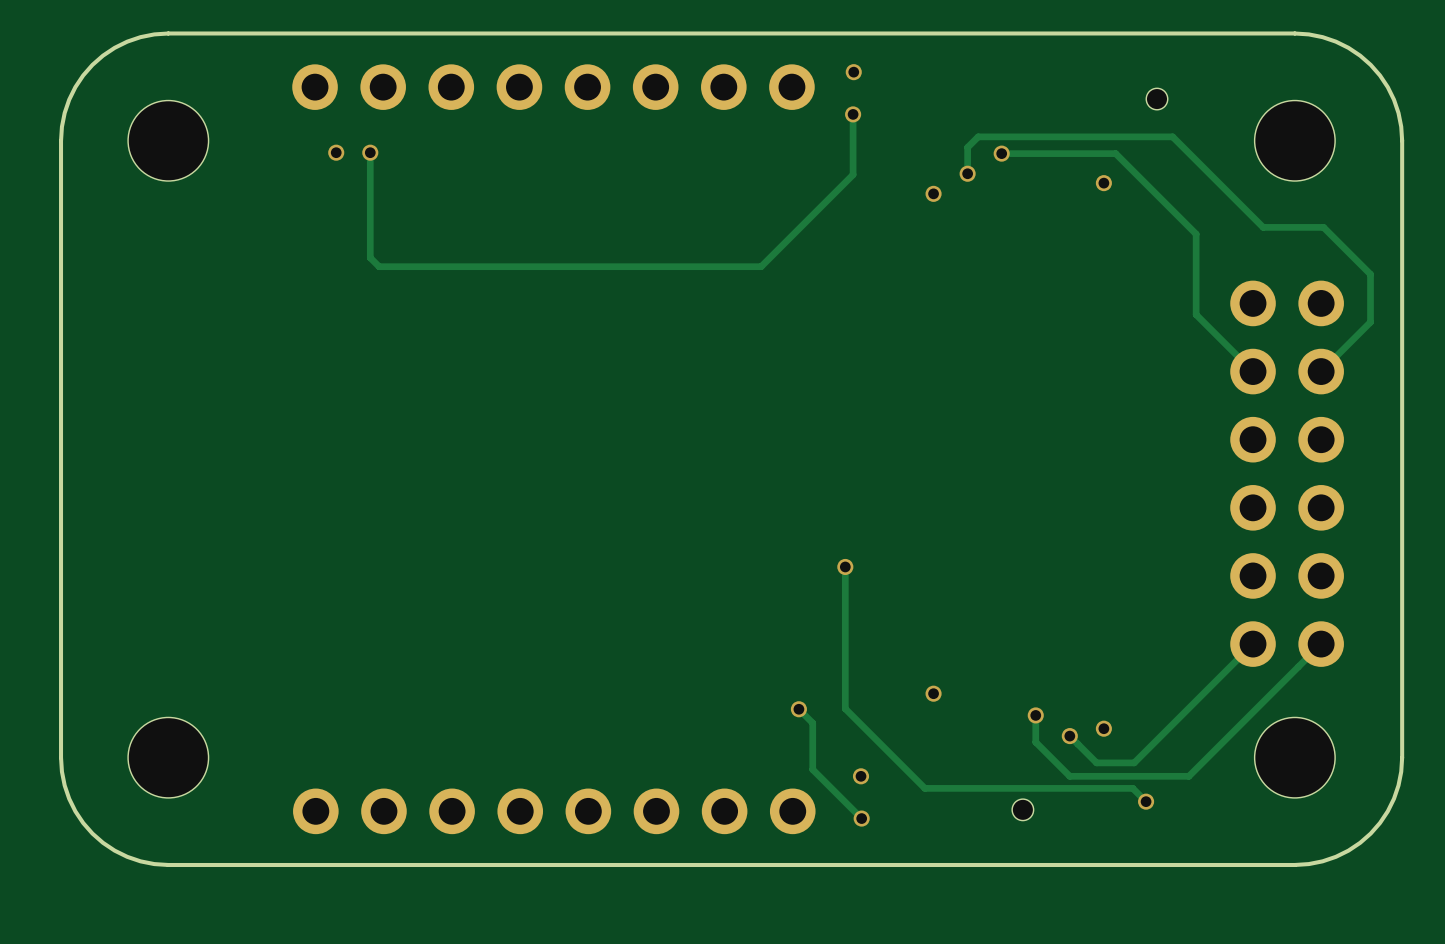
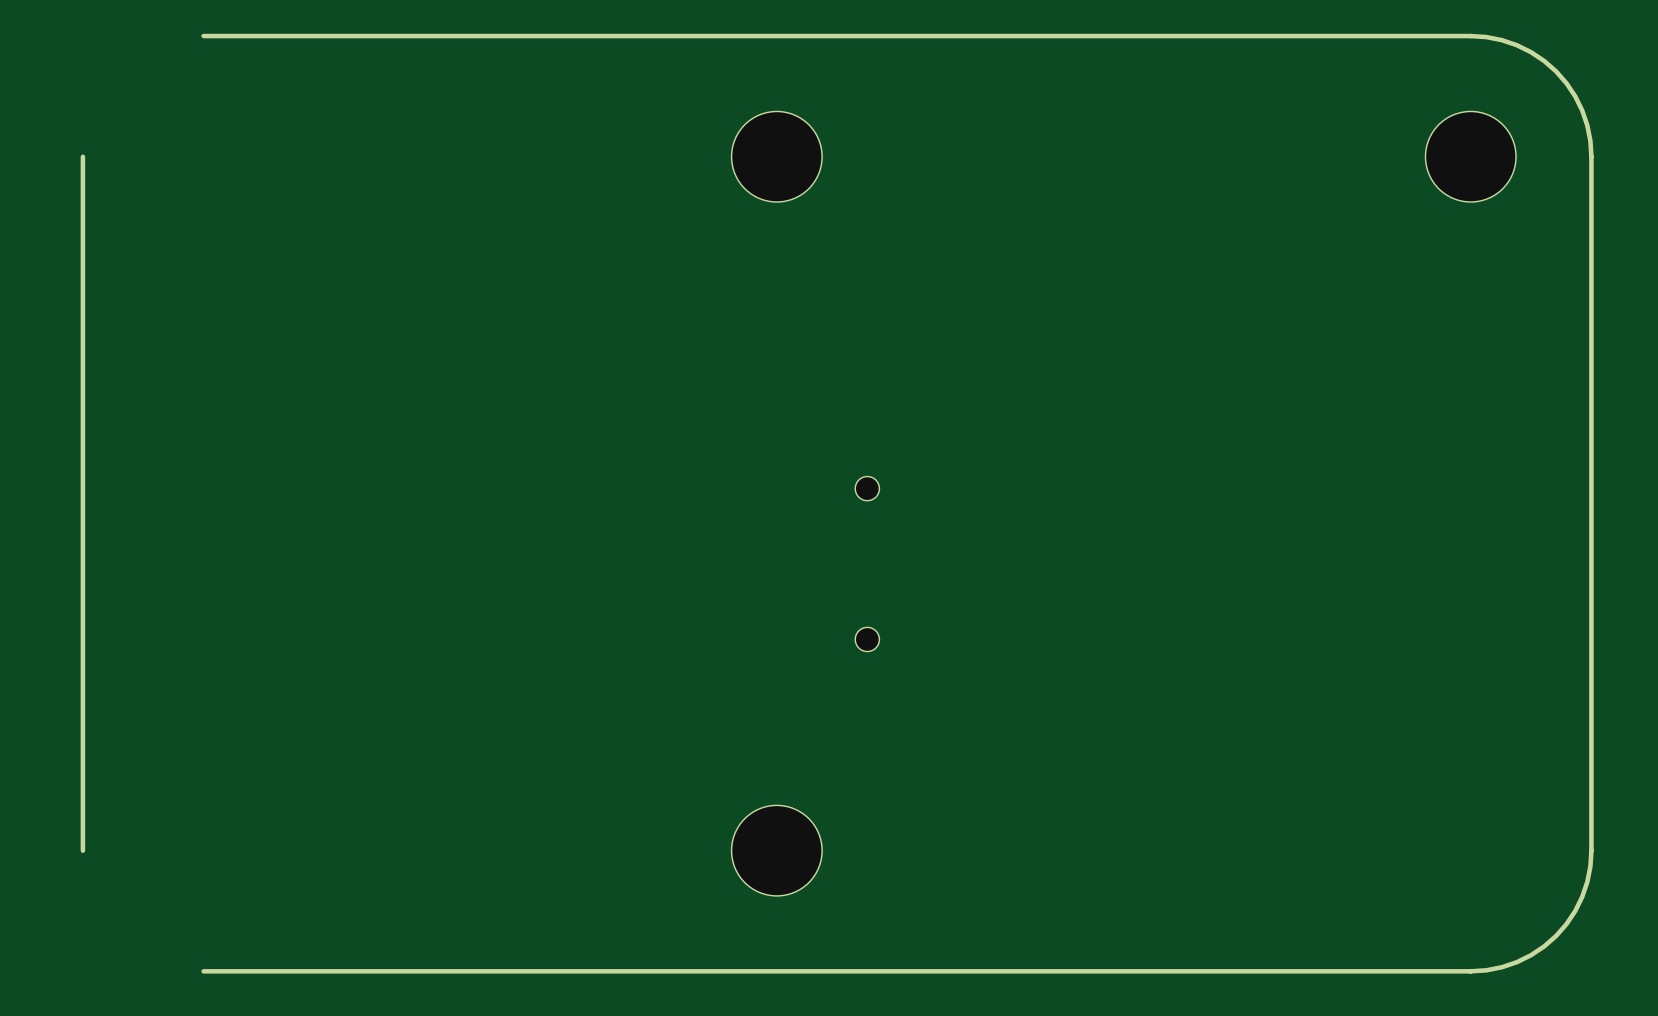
board edge: (168, 33) (140, 37) (127, 41) (103, 55) (92, 64) (75, 87) (69, 99) (64, 113) (61, 140) -> none
via: (853, 72) -> none
part: (553, 87) -> none
part: (1157, 99) -> none
track: (853, 114) (853, 174) (761, 266) (379, 266) (370, 257) (370, 152) -> none
via: (853, 114) -> none
part: (168, 140) -> none
part: none -> (776, 156)
via: (336, 152) -> none
via: (370, 152) -> none
track: (1001, 153) (1115, 153) (1196, 234) (1196, 314) (1253, 371) -> none
via: (1001, 153) -> none
track: (967, 173) (967, 147) (978, 136) (1172, 136) (1263, 227) (1323, 227) (1370, 274) (1370, 322) (1321, 371) -> none
via: (967, 173) -> none
via: (1103, 183) -> none
via: (933, 193) -> none
part: none -> (867, 488)
part: (1287, 473) -> none
track: (845, 566) (845, 708) (924, 788) (1132, 788) (1146, 801) -> none
via: (845, 566) -> none
part: none -> (867, 639)
track: (1253, 644) (1134, 762) (1096, 762) (1069, 736) -> none
track: (1321, 644) (1188, 776) (1069, 776) (1035, 742) (1035, 715) -> none
via: (933, 693) -> none
track: (798, 709) (812, 723) (812, 769) (861, 818) -> none
via: (798, 709) -> none
via: (1035, 715) -> none
via: (1103, 728) -> none
via: (1069, 736) -> none
board edge: (61, 757) (64, 785) (69, 798) (75, 811) (92, 833) (114, 850) (127, 856) (140, 861) (168, 864) -> none
part: (168, 757) -> none
part: none -> (776, 850)
part: (1294, 757) -> none
via: (861, 776) -> none
via: (1146, 801) -> none
part: (1022, 809) -> none
part: (554, 811) -> none
via: (861, 818) -> none

